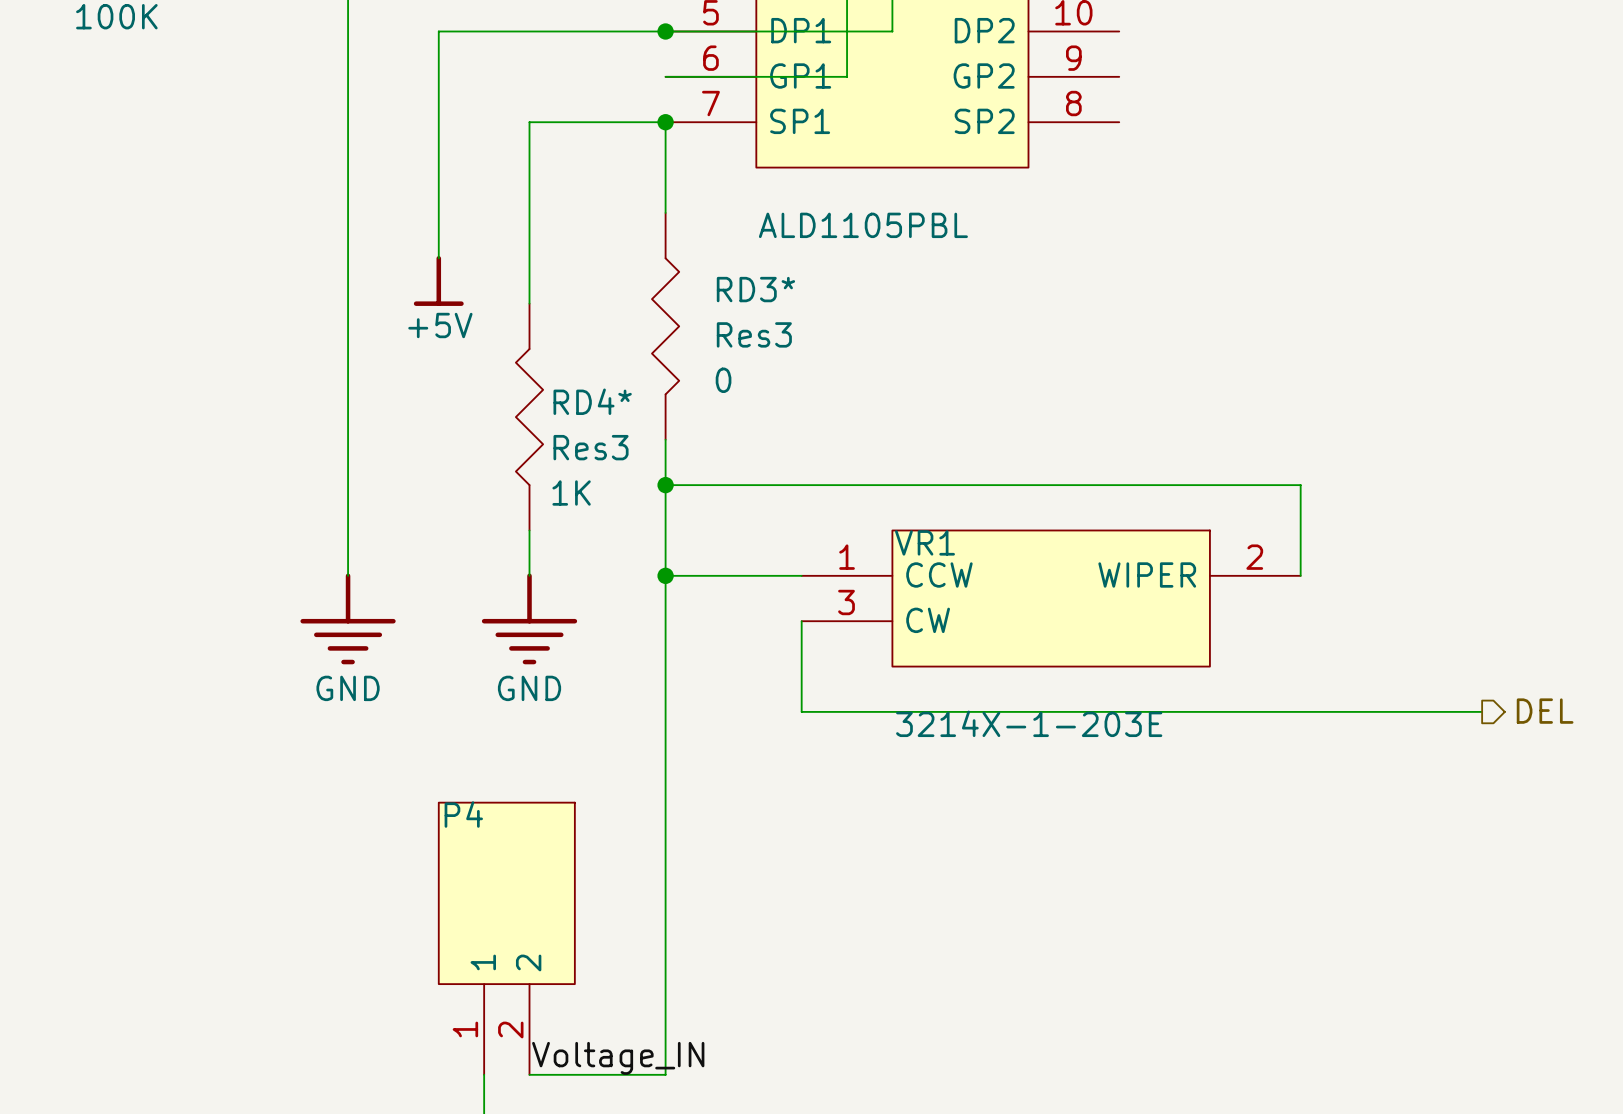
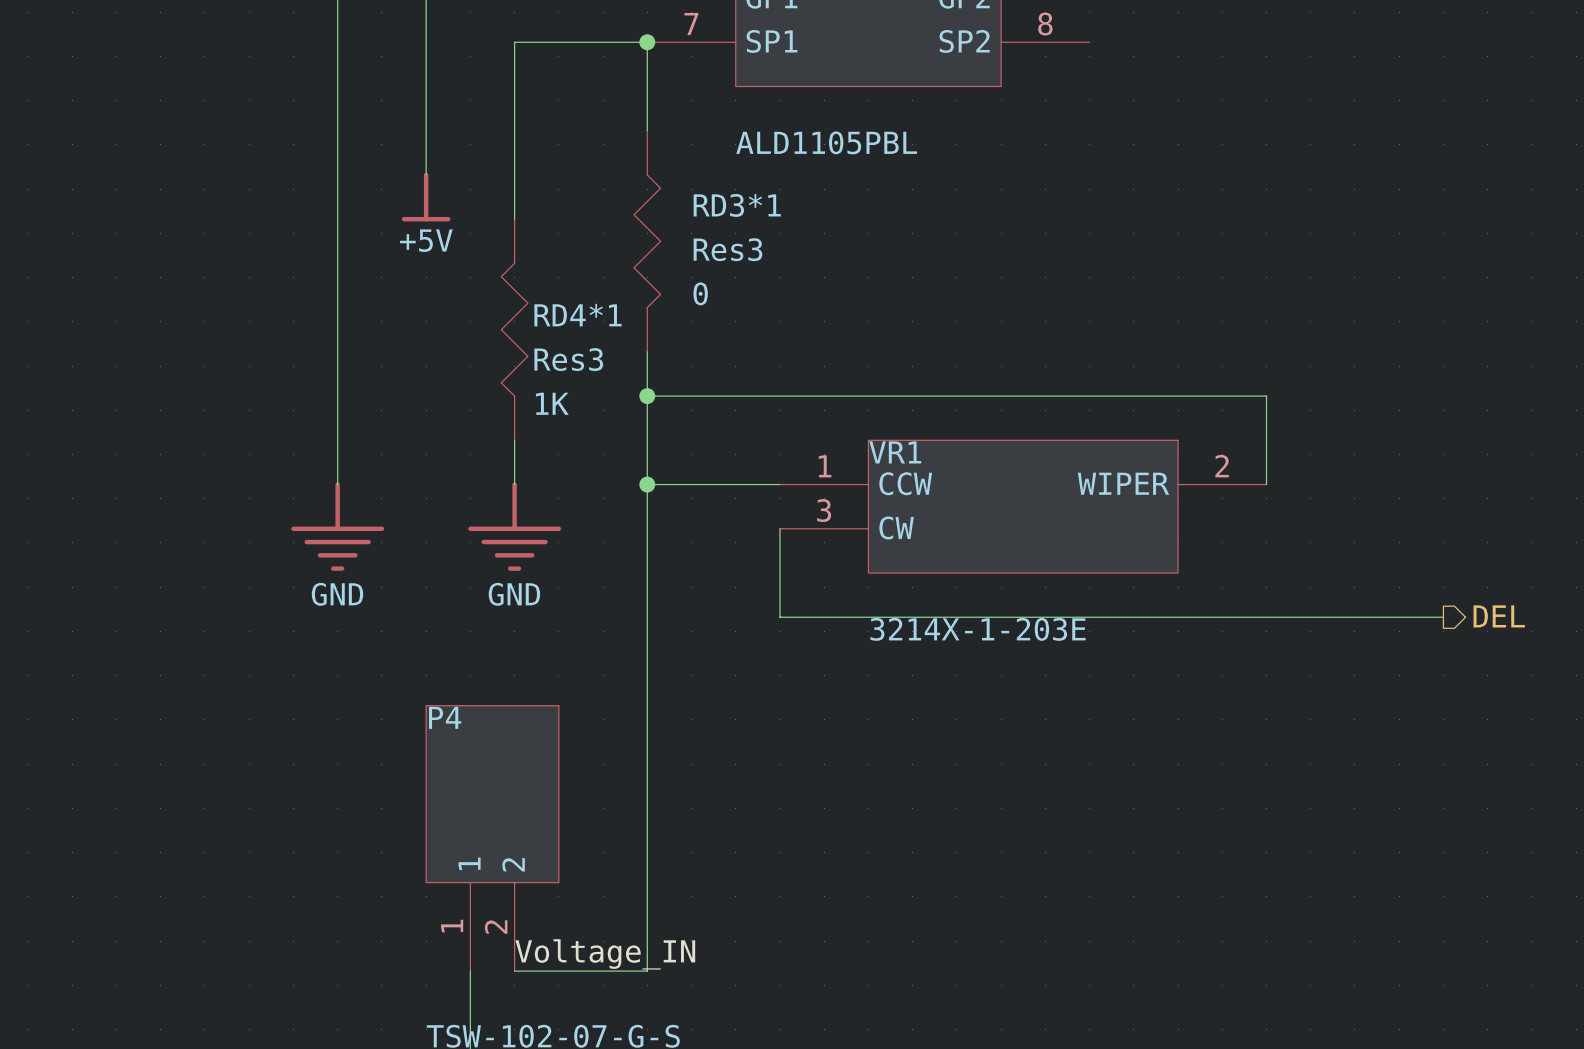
RD3* name: RD3* (755, 289) -> RD3*1 (737, 205)
RD4* name: RD4* (592, 401) -> RD4*1 (577, 315)

